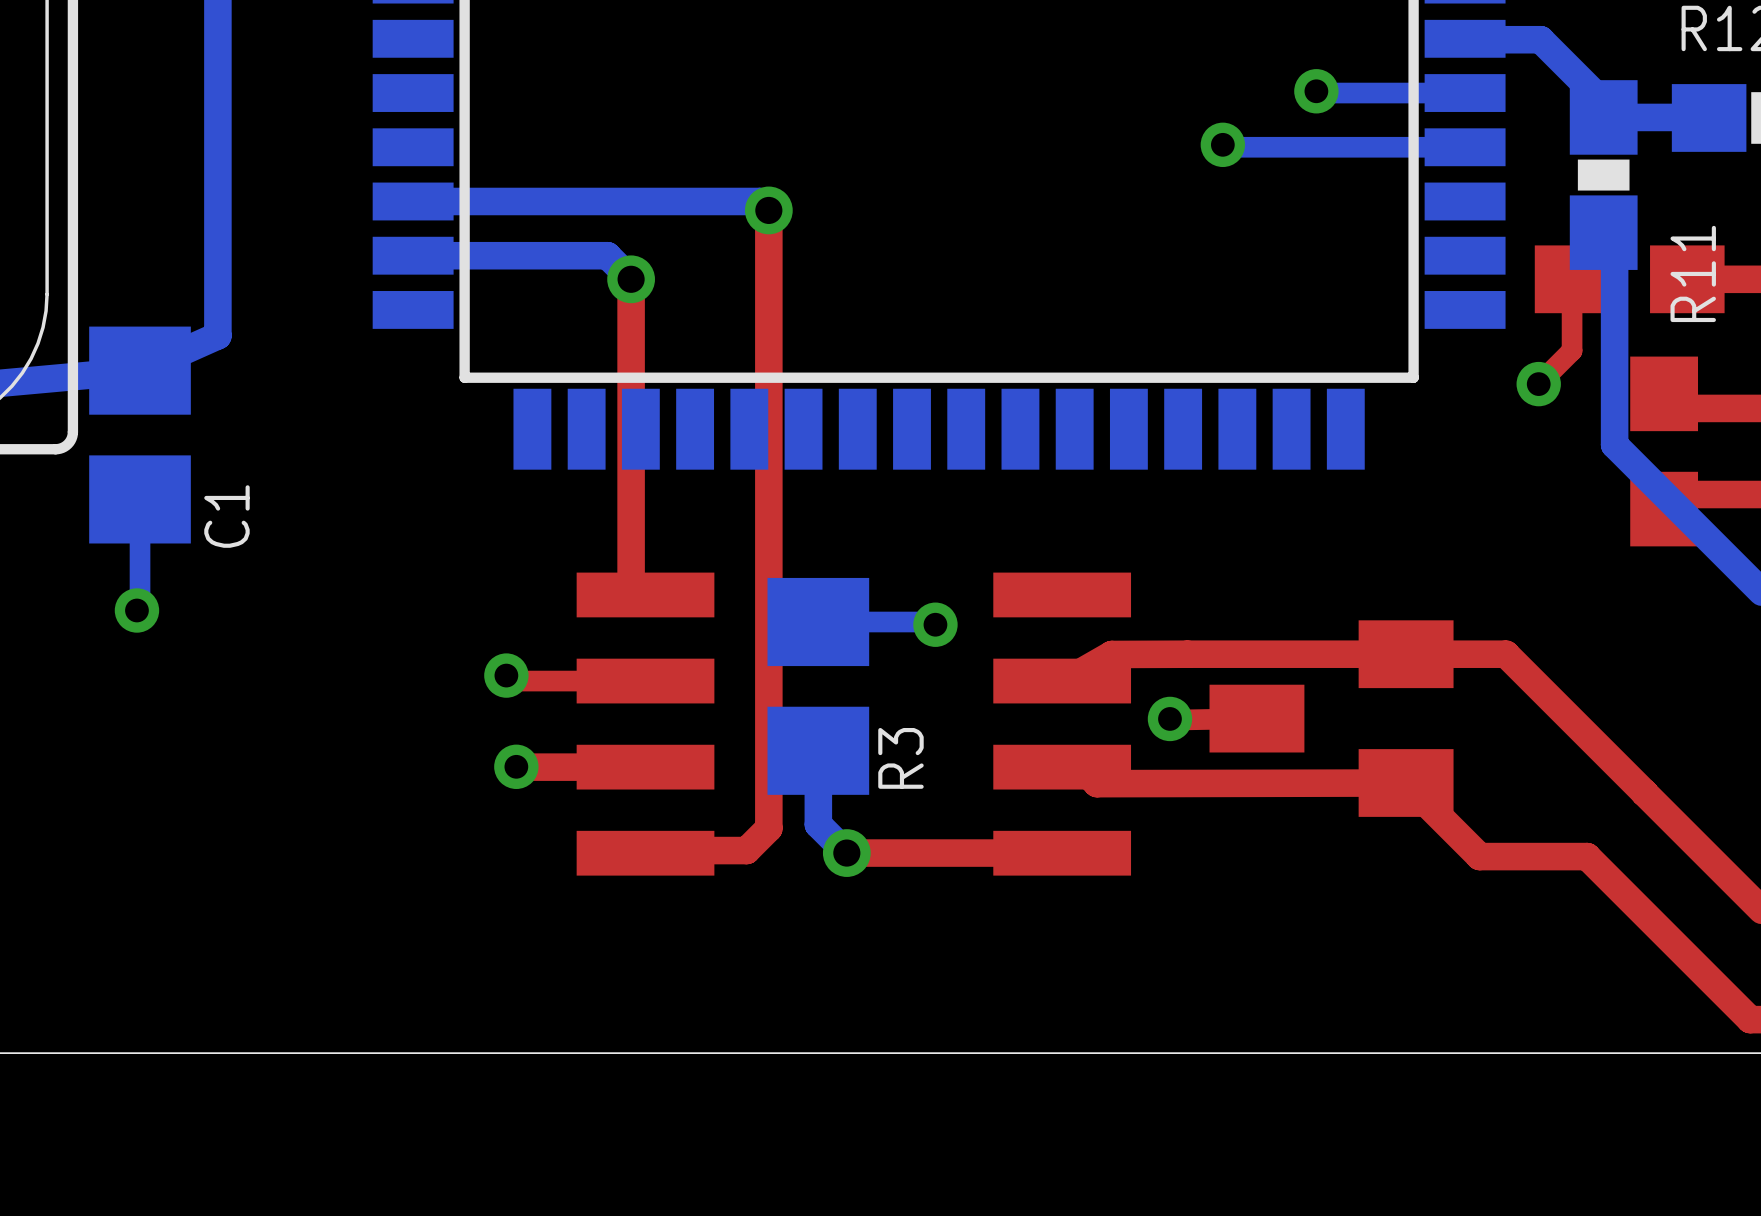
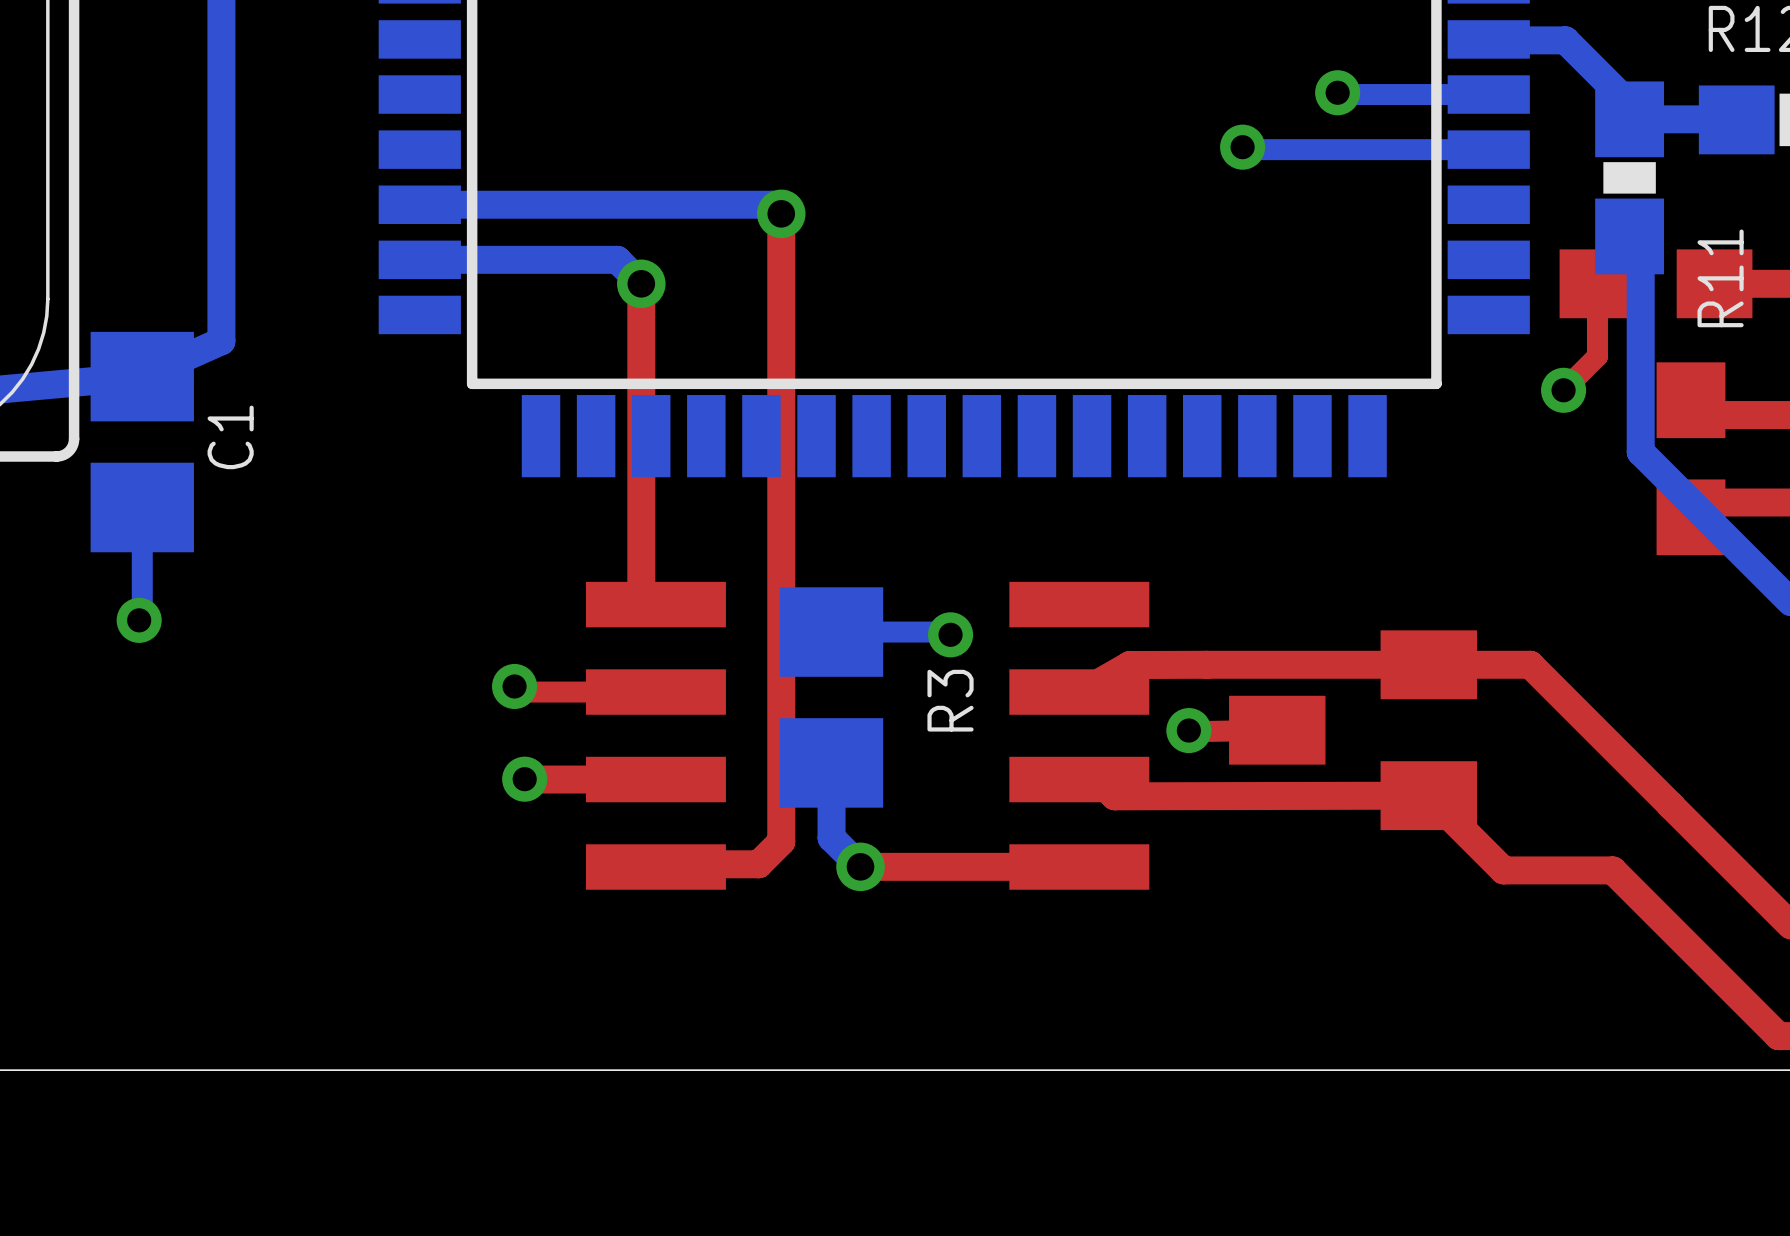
C1 name position: C1 (226, 516) -> C1 (230, 437)
R3 name position: R3 (900, 758) -> R3 (950, 700)

